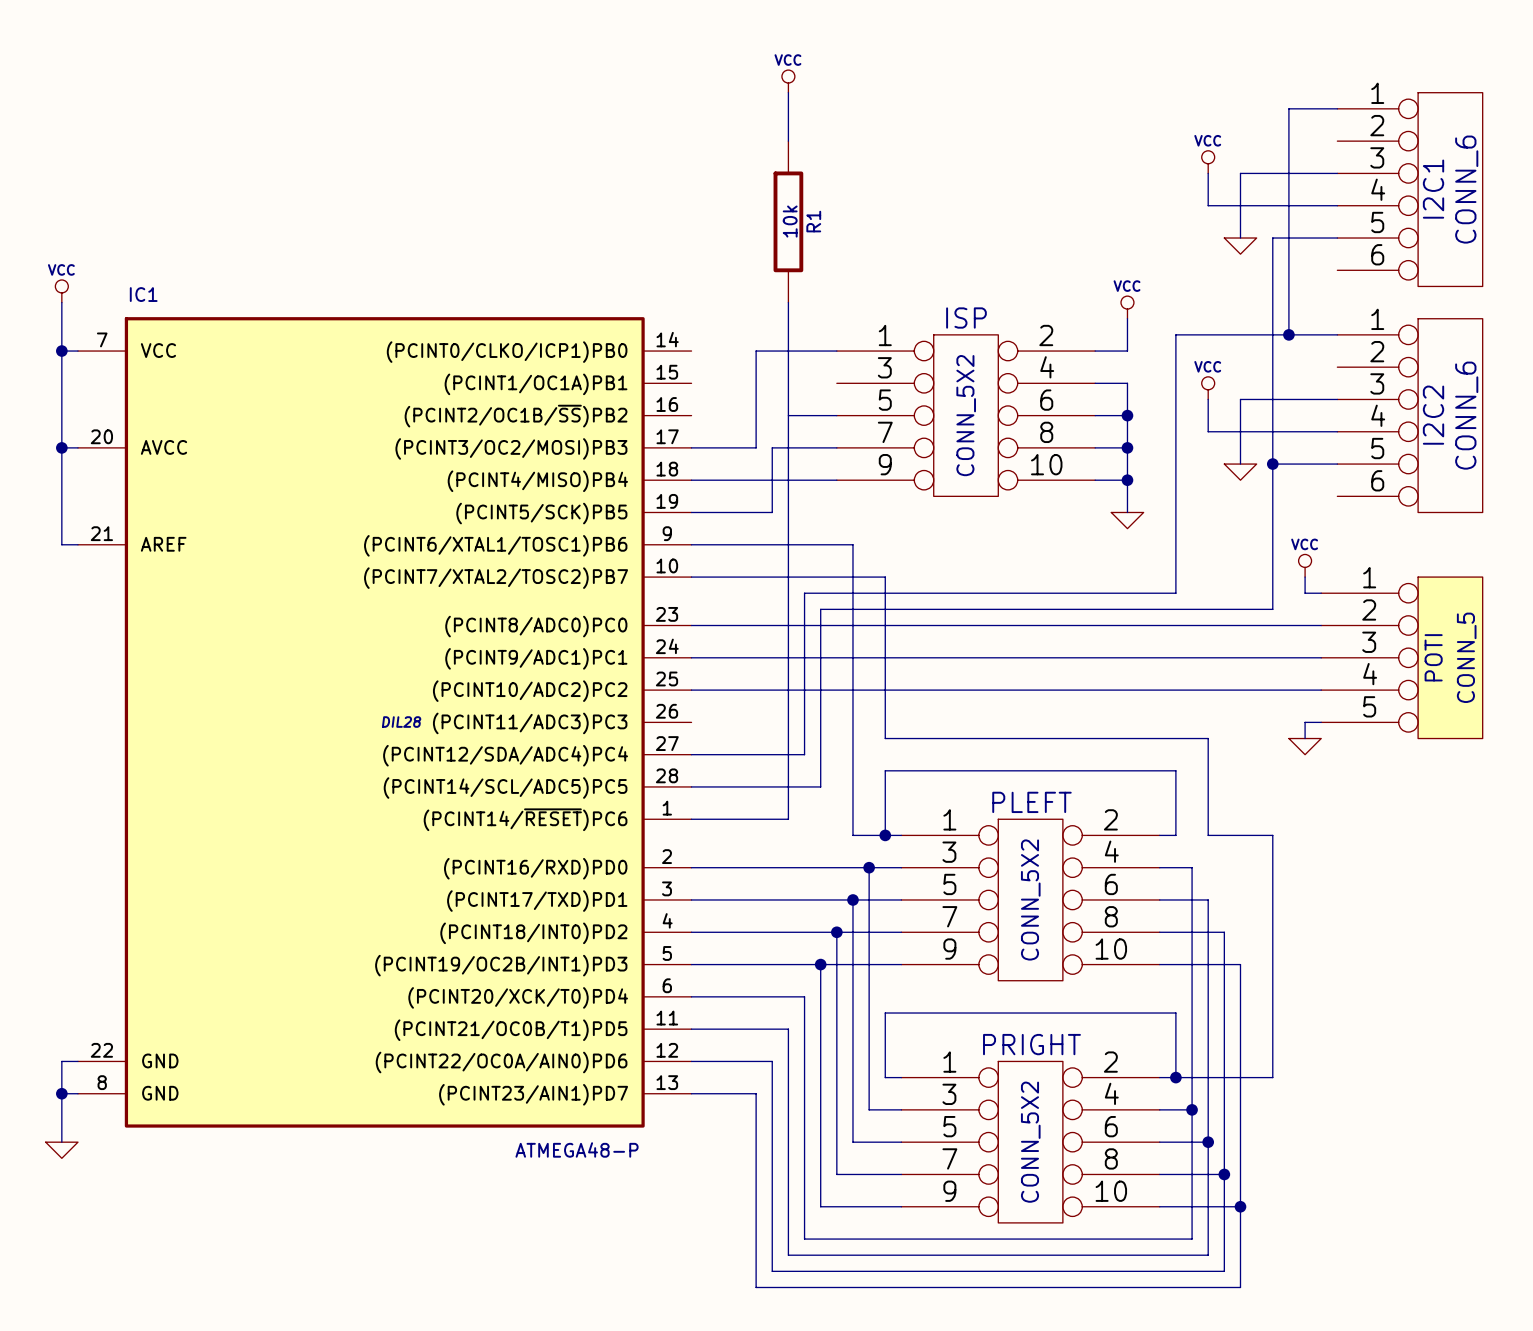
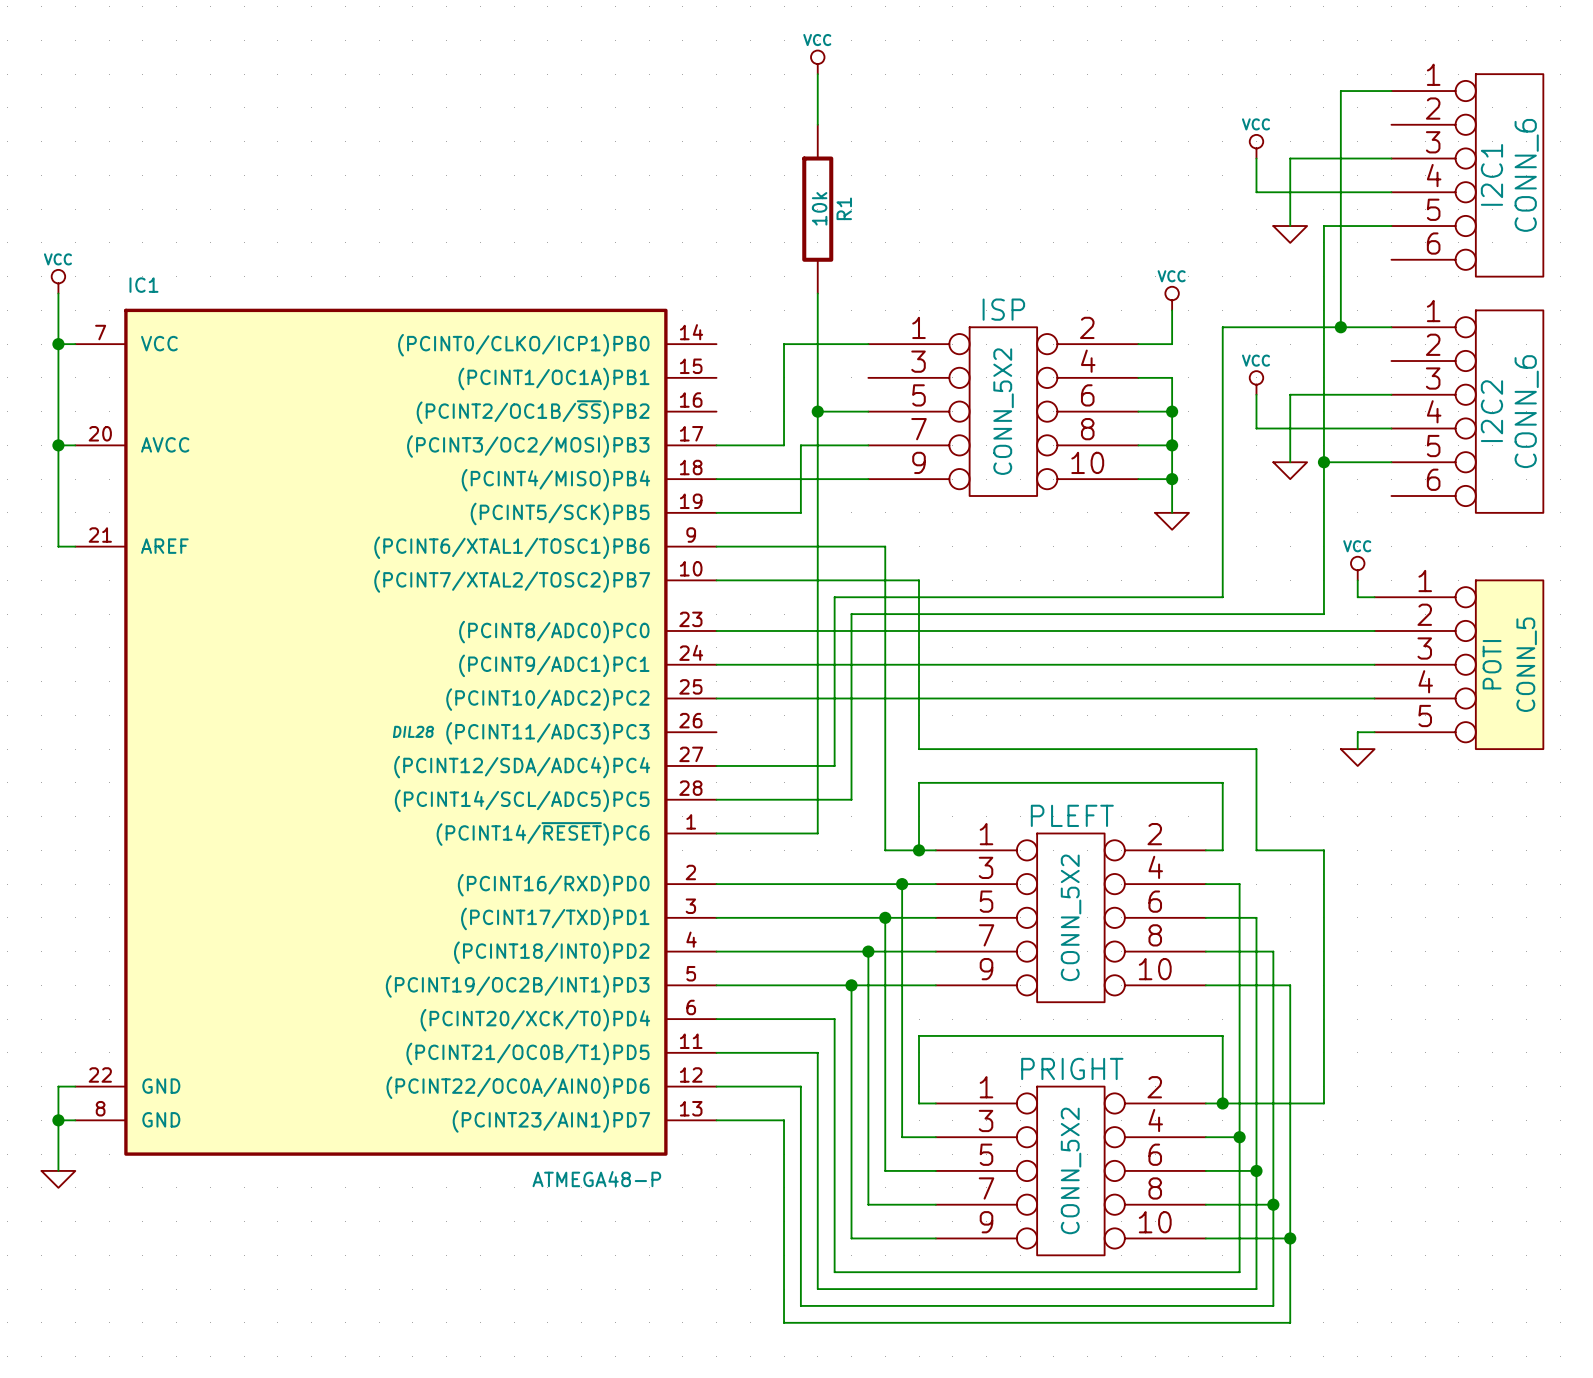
junction: none -> (817, 411)

